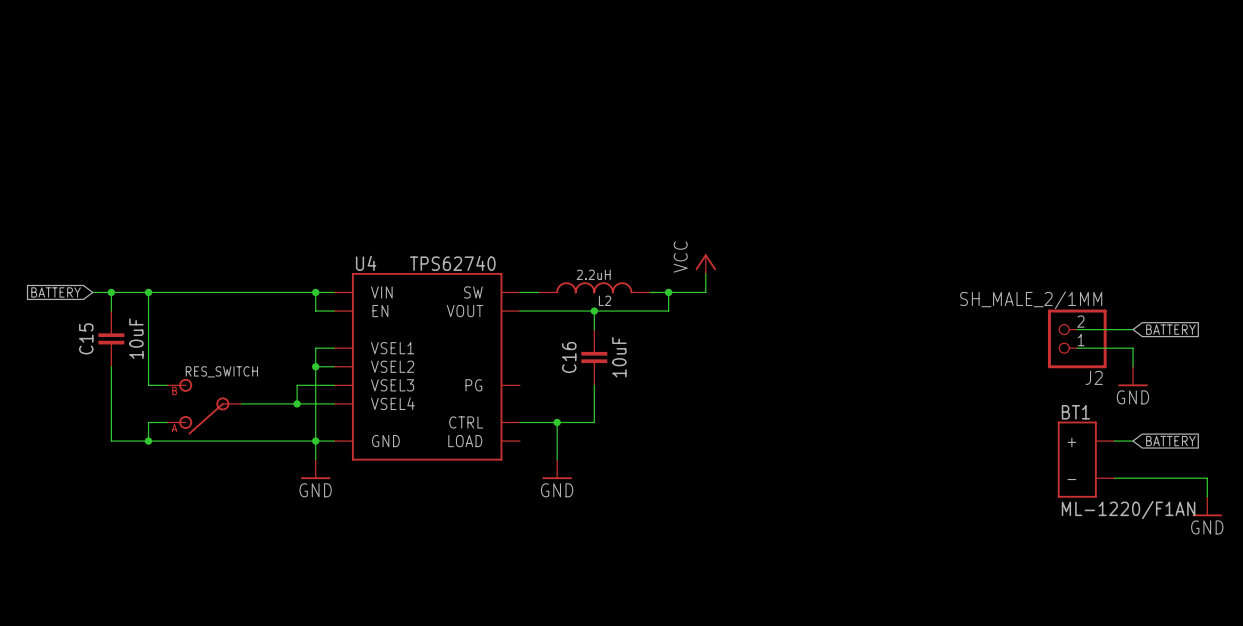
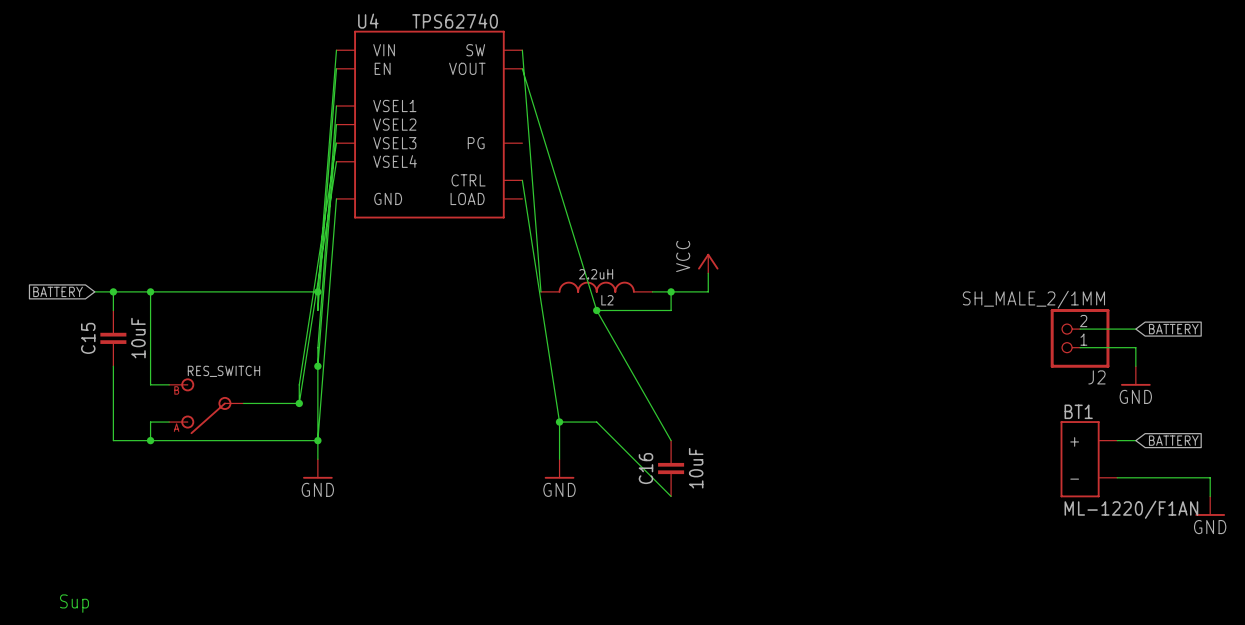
wire: none -> (522, 68) (596, 310) (671, 440)
wire: (315, 292) (334, 292) -> (317, 291) (336, 50)
wire: (520, 292) (538, 292) -> (522, 50) (540, 291)
wire: (315, 311) (334, 311) -> (317, 310) (336, 68)
wire: (520, 311) (594, 311) (594, 329) -> none
wire: (315, 348) (334, 348) -> (317, 347) (336, 106)
C16 position: (594, 357) -> (671, 468)
wire: (315, 366) (334, 366) -> (317, 366) (336, 124)
U4 position: (427, 366) -> (429, 124)
wire: (297, 385) (334, 385) -> (299, 384) (336, 143)
wire: (594, 385) (594, 422) -> (671, 496) (596, 422)
wire: (297, 403) (334, 403) -> (299, 403) (336, 161)
wire: (520, 422) (557, 422) -> (522, 180) (559, 422)
wire: (315, 441) (334, 441) -> (317, 440) (336, 198)
text: none -> Sup (74, 603)

